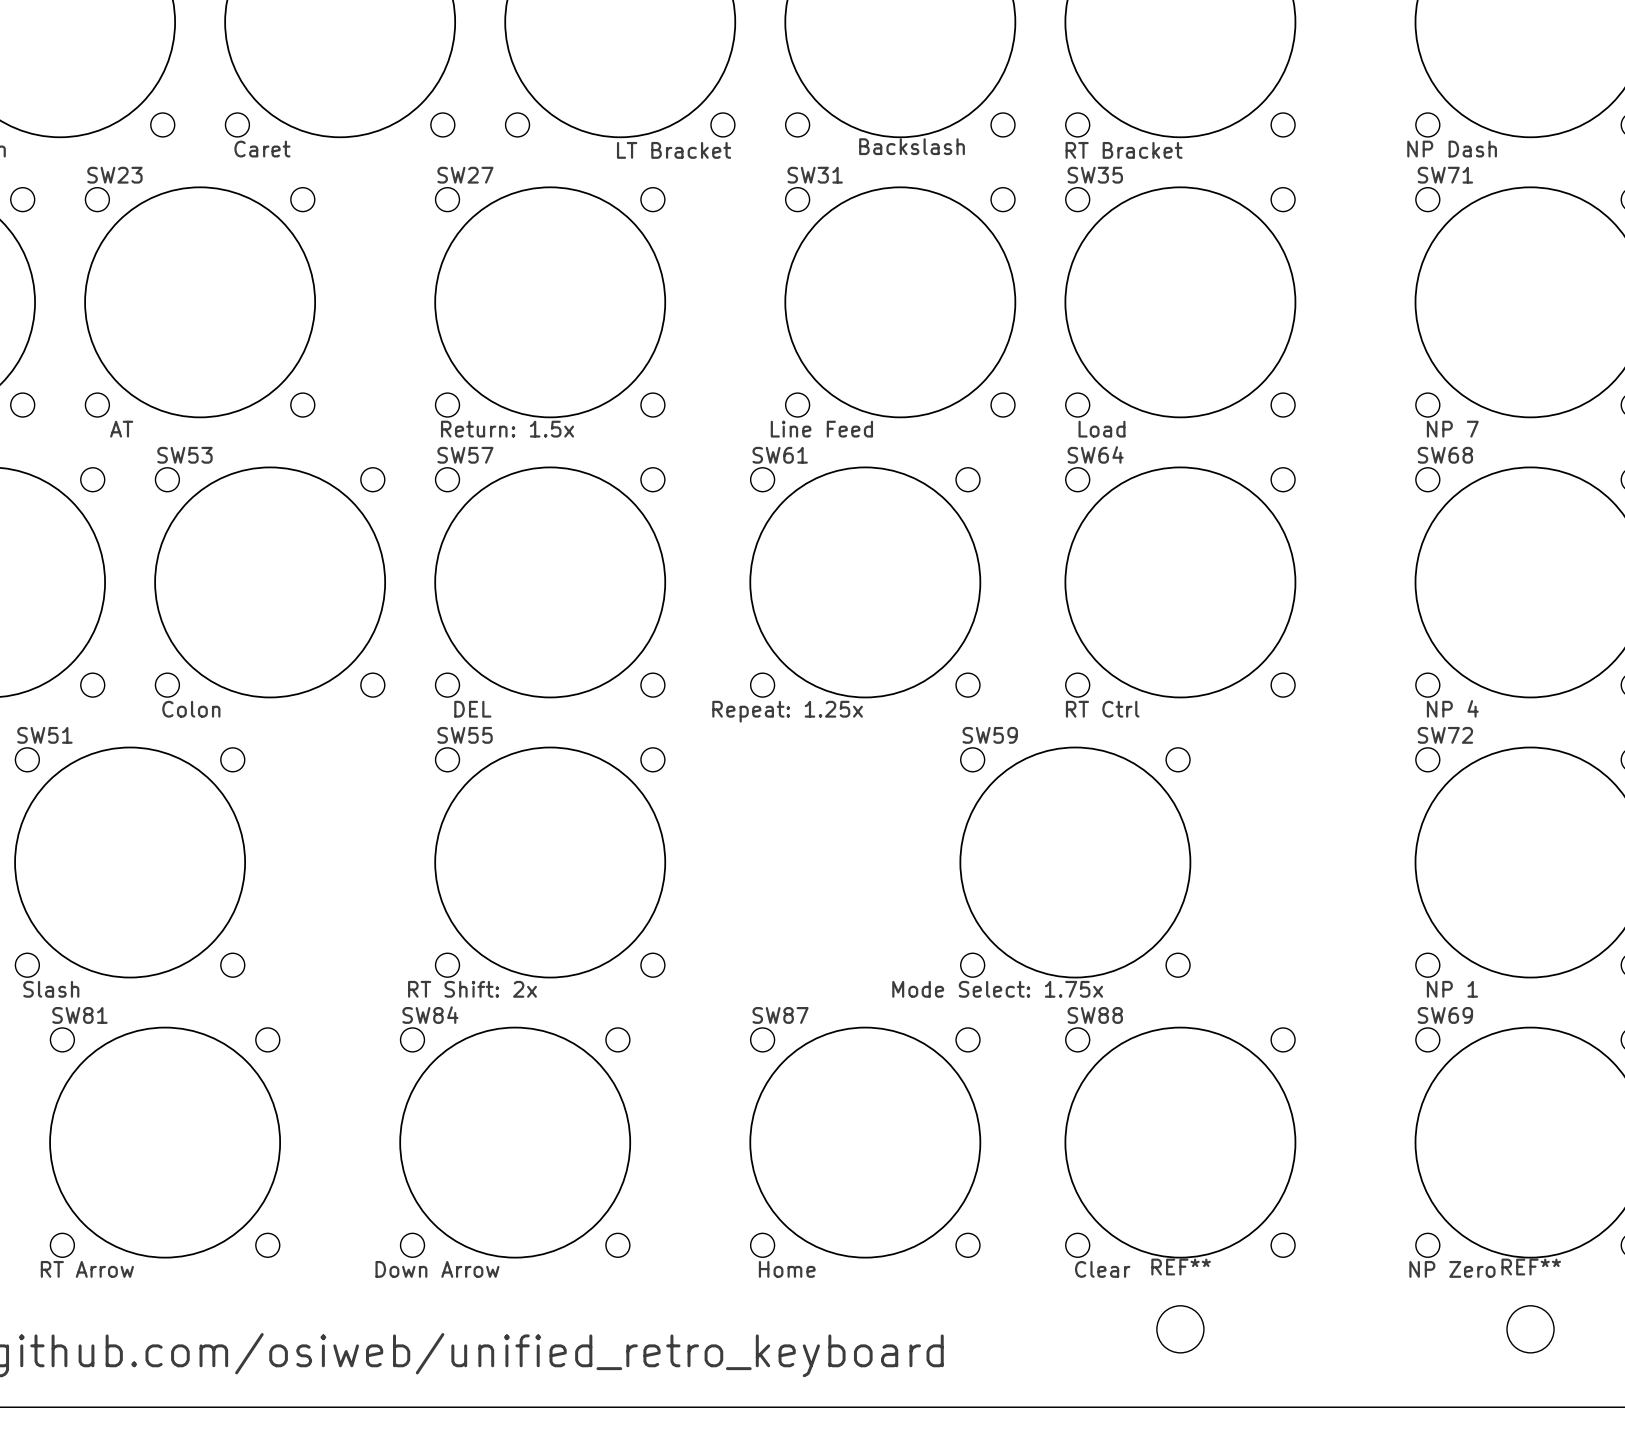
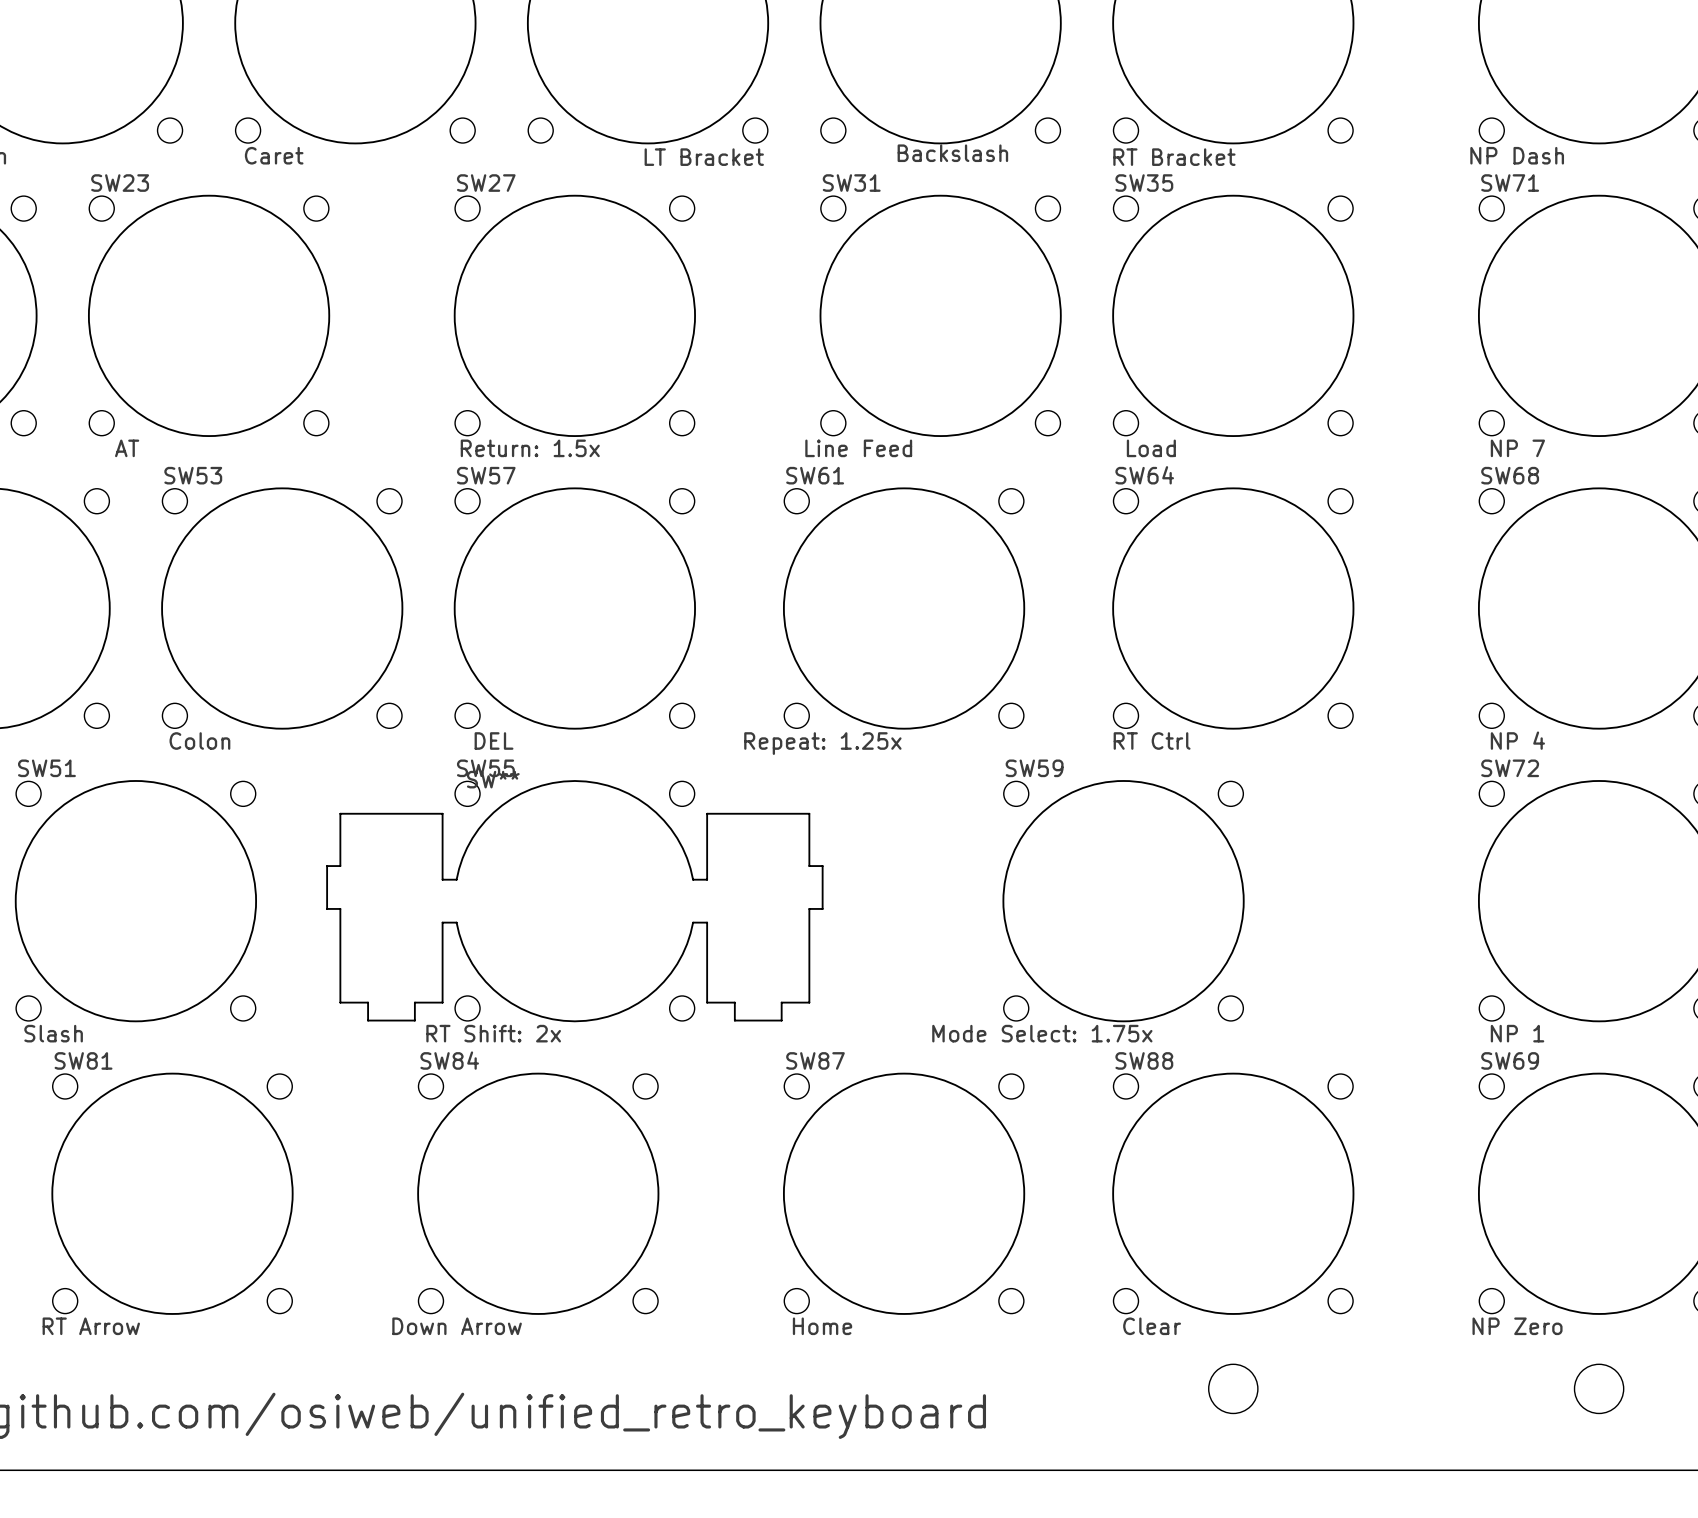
SW55 footprint: [434, 746, 667, 979] -> [326, 780, 824, 1023]
REF** name: REF** (1181, 1267) -> none
REF** name: REF** (1531, 1267) -> none

